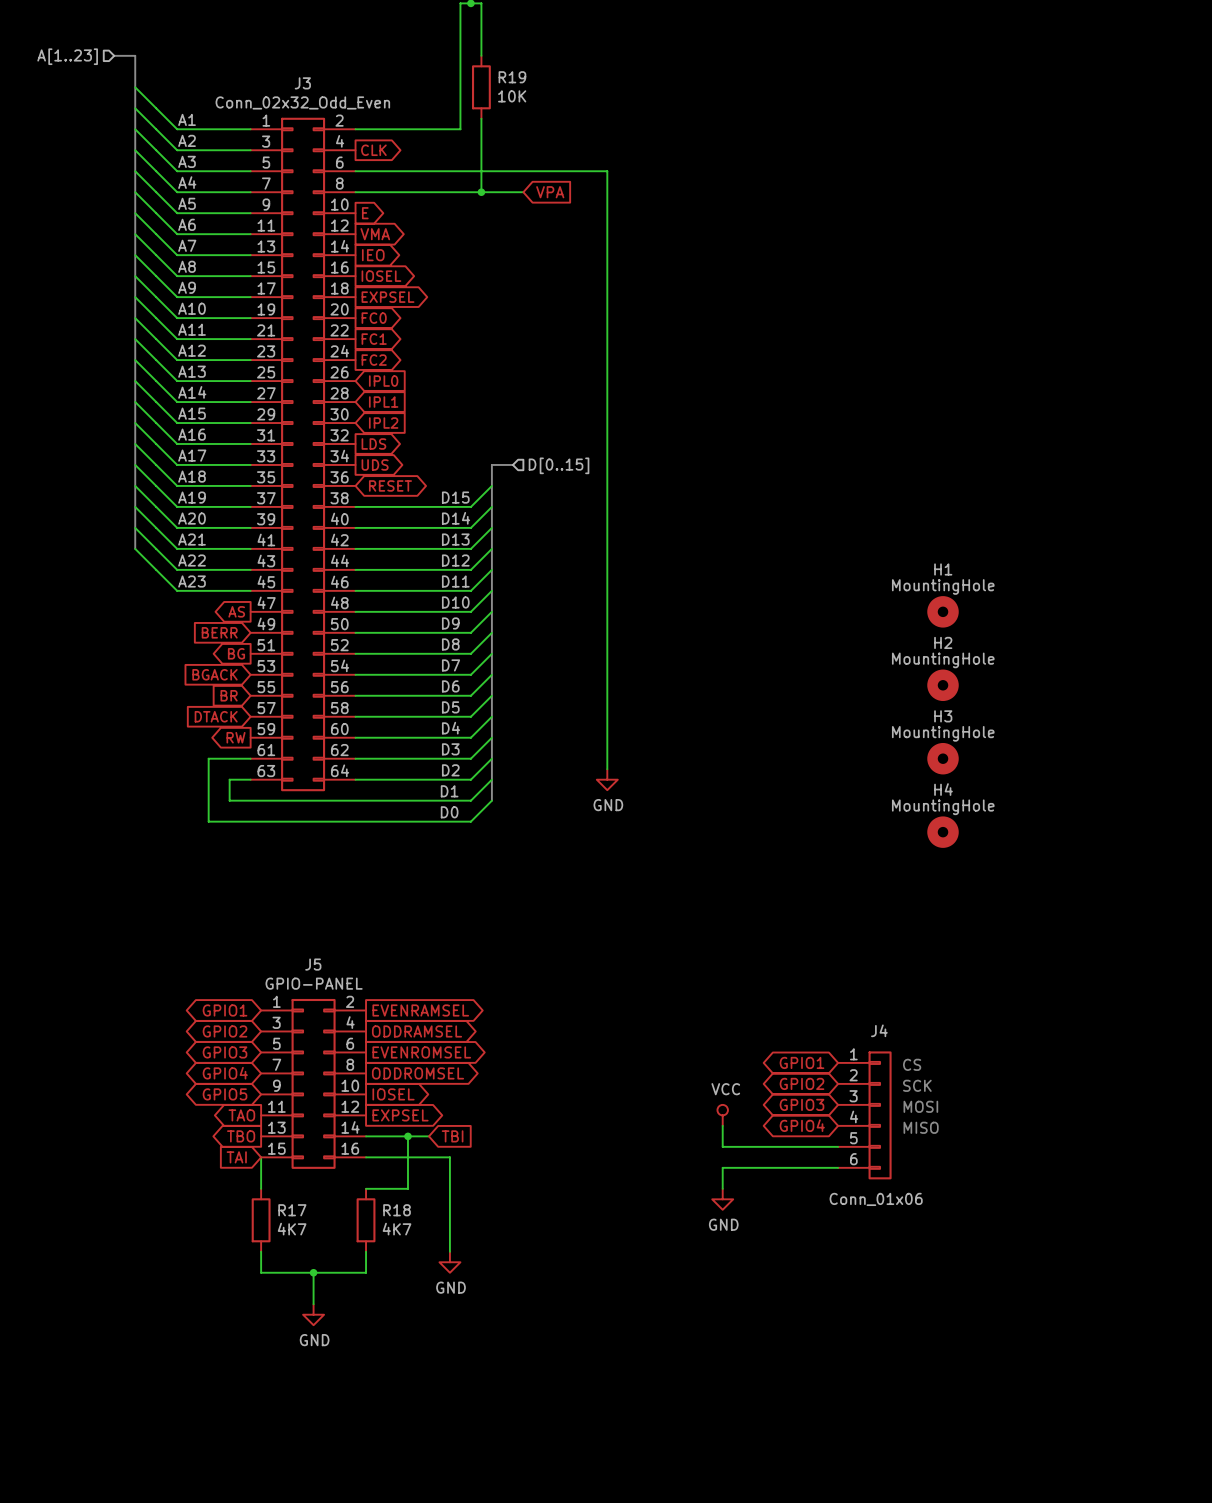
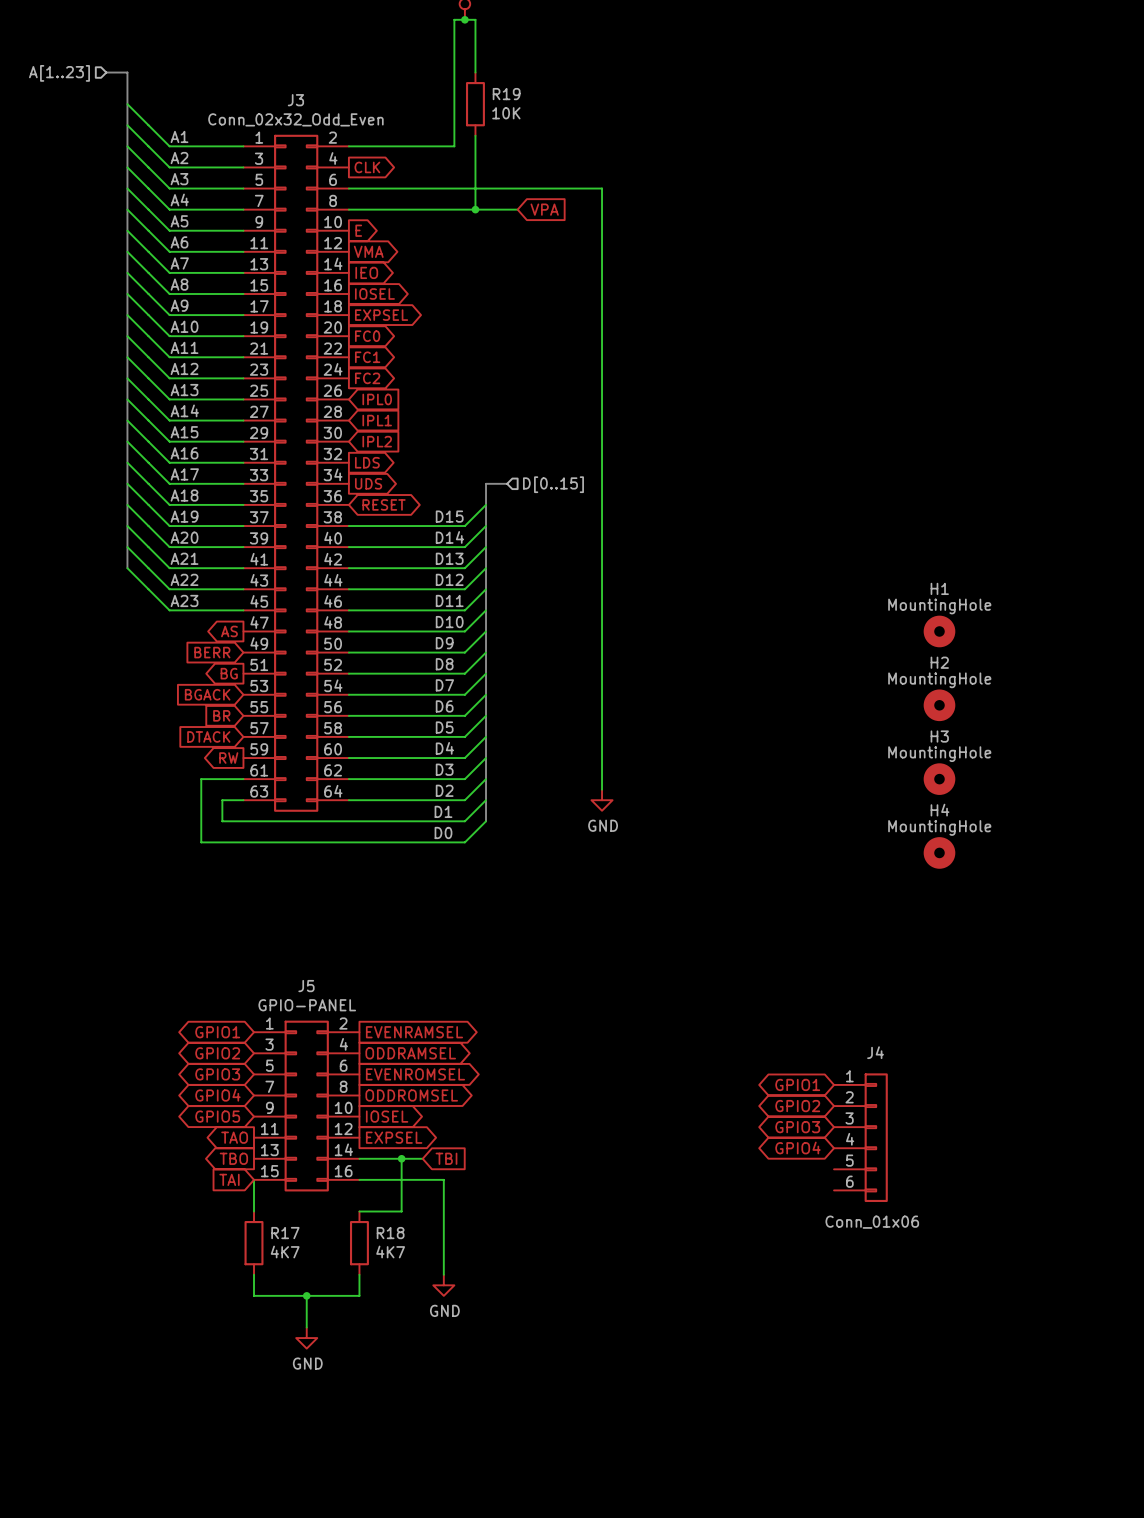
text: CS (912, 1064) -> none
text: SCK (917, 1085) -> none
text: MOSI (920, 1106) -> none
power symbol: VCC (722, 1115) -> none
wire: (722, 1125) (722, 1146) (838, 1146) -> none
text: MISO (921, 1127) -> none
wire: (838, 1167) (722, 1167) (722, 1188) -> none
power symbol: GND (722, 1199) -> none

